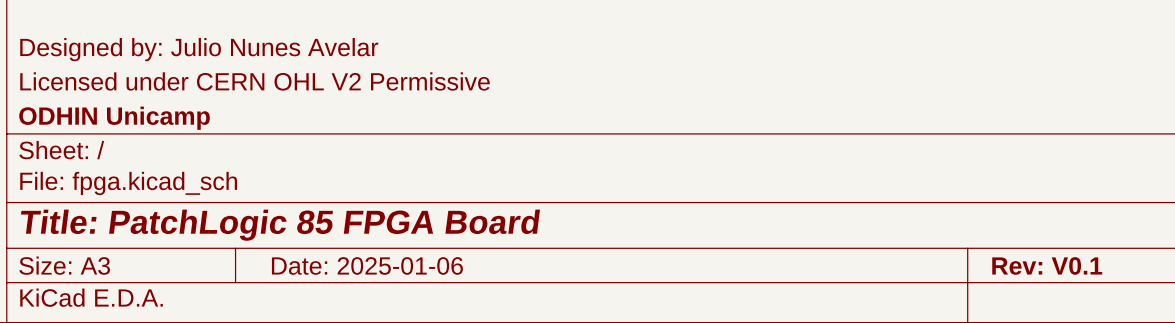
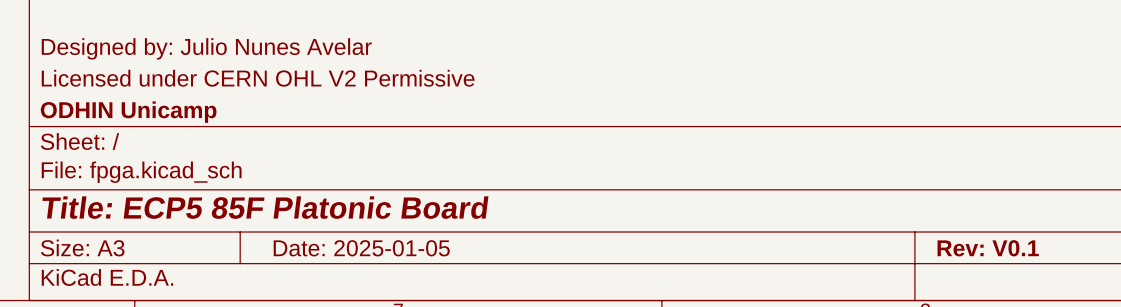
title block: Title: PatchLogic 85 FPGA Board (280, 225) -> Title: ECP5 85F Platonic Board (265, 207)
title block: Date: 2025-01-06 (367, 265) -> Date: 2025-01-05 (361, 248)

